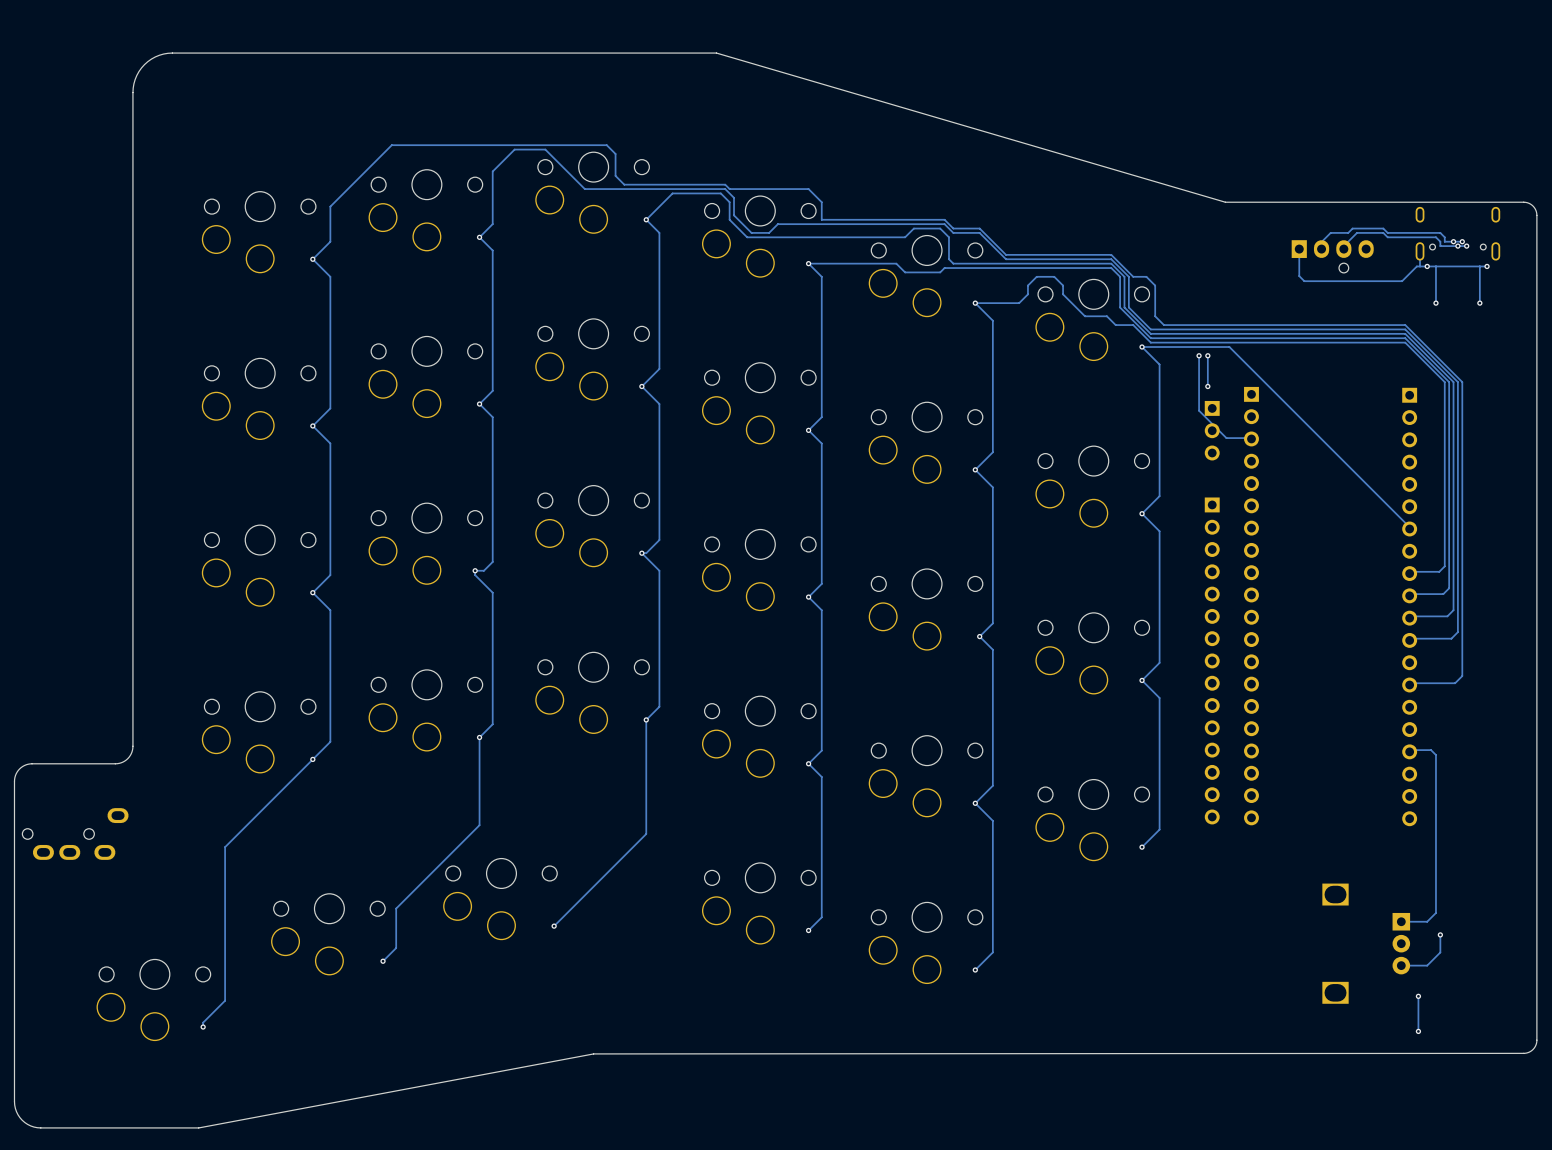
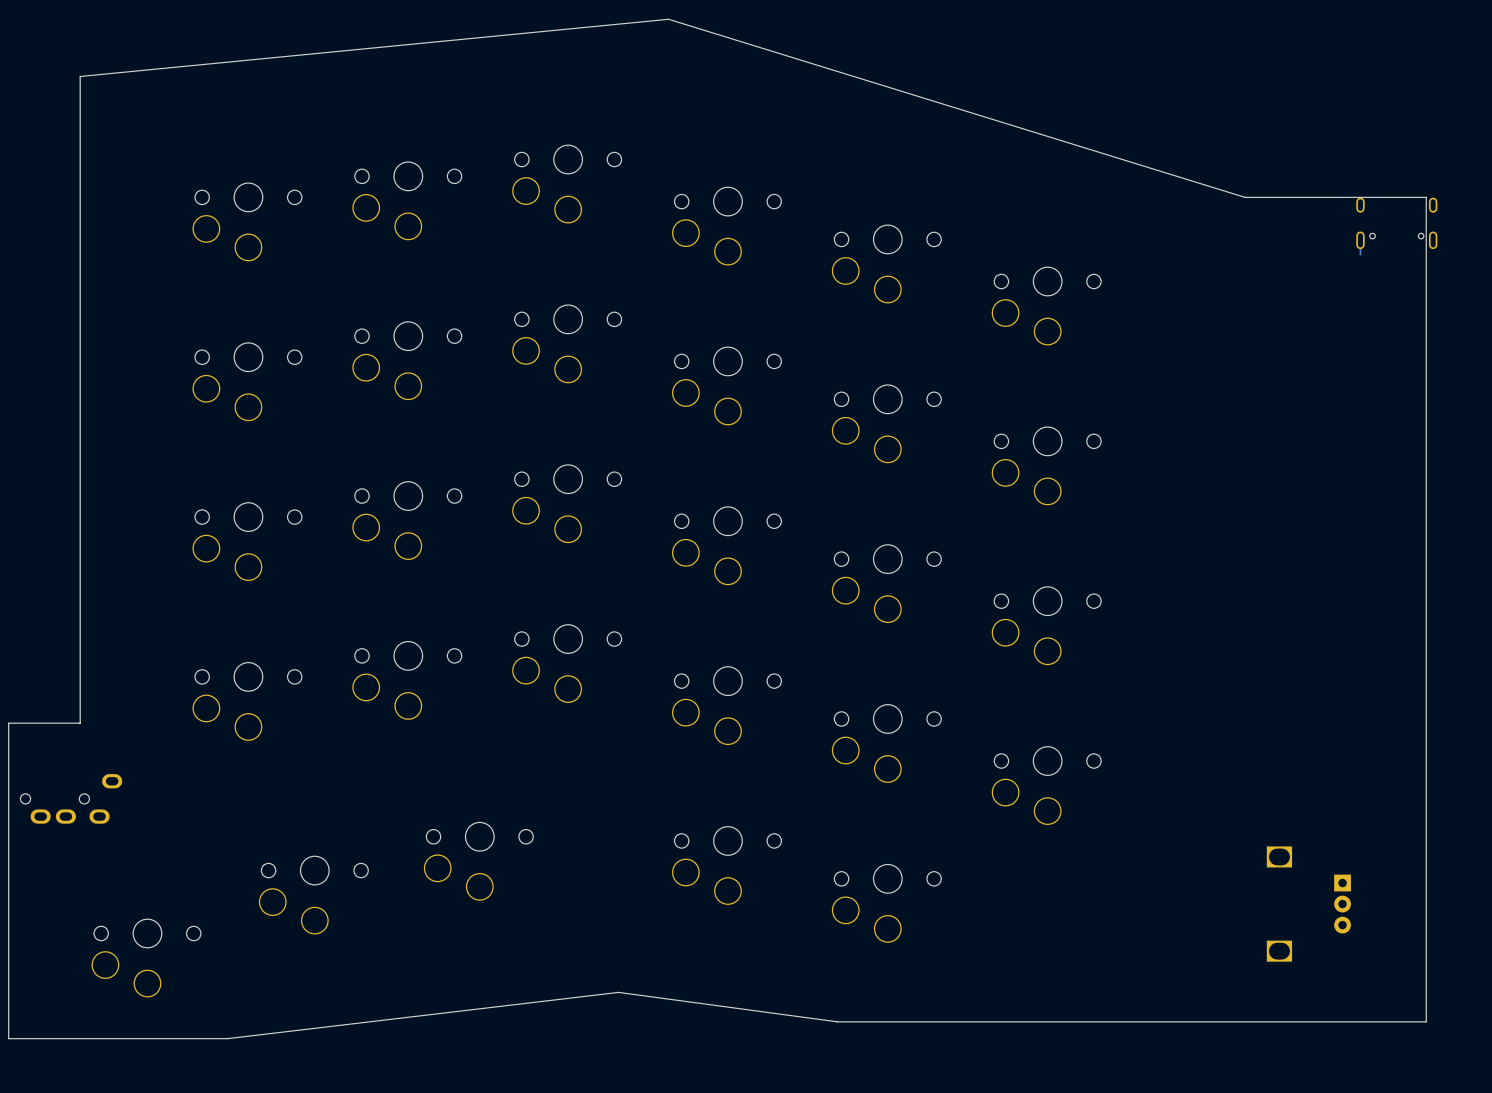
board edge: (716, 53) (1225, 202) (1523, 202) (1534, 207) (1536, 215) (1536, 1040) (1531, 1050) (1523, 1053) (593, 1053) (198, 1127) (40, 1127) (30, 1125) (19, 1117) (14, 1101) (15, 775) (21, 767) (30, 763) (119, 763) (127, 758) (132, 748) (132, 92) (139, 71) (151, 59) (172, 53) (716, 53) -> (668, 19) (1245, 197) (1426, 197) (1426, 1021) (837, 1021) (618, 992) (227, 1038) (8, 1038) (8, 723) (80, 723) (80, 76) (668, 19)
via: (646, 219) -> none
via: (479, 237) -> none
via: (1453, 241) -> none
track: (1462, 241) (1444, 241) (1444, 237) (1440, 232) (1387, 232) (1383, 228) (1352, 228) (1348, 232) (1330, 232) (1321, 242) (1321, 249) -> none
via: (1462, 241) -> none
via: (1457, 246) -> none
track: (1466, 246) (1440, 246) (1440, 241) (1435, 237) (1387, 237) (1383, 232) (1357, 232) (1343, 246) (1343, 249) -> none
via: (1466, 246) -> none
track: (1299, 249) (1299, 276) (1304, 281) (1402, 281) (1416, 266) (1487, 266) -> none
part: (1332, 256) -> none
via: (312, 259) -> none
via: (808, 263) -> none
via: (1427, 266) -> none
track: (1435, 266) (1435, 303) -> none
track: (1479, 266) (1479, 303) -> none
via: (1487, 266) -> none
via: (975, 303) -> none
via: (1435, 303) -> none
via: (1479, 303) -> none
via: (1142, 347) -> none
track: (1199, 355) (1199, 410) (1226, 438) (1253, 438) -> none
via: (1199, 355) -> none
track: (1207, 355) (1207, 386) -> none
via: (1207, 355) -> none
via: (641, 386) -> none
via: (1207, 386) -> none
via: (479, 404) -> none
via: (312, 425) -> none
via: (808, 430) -> none
part: (1212, 430) -> none
via: (975, 469) -> none
via: (1142, 513) -> none
track: (1409, 527) (1229, 347) (1142, 347) (1159, 364) (1159, 496) (1142, 513) (1159, 531) (1159, 662) (1142, 680) (1159, 697) (1159, 829) (1142, 847) -> none
via: (641, 553) -> none
via: (475, 570) -> none
track: (1409, 571) (1439, 571) (1444, 566) (1444, 382) (1405, 342) (1150, 342) (1133, 325) (1115, 325) (1106, 316) (1084, 316) (1063, 294) (1063, 285) (1054, 276) (1036, 276) (1027, 285) (1027, 294) (1019, 303) (975, 303) (992, 320) (992, 452) (975, 469) (992, 487) (992, 623) (979, 636) (992, 649) (992, 785) (975, 803) (992, 820) (992, 952) (975, 970) -> none
via: (312, 592) -> none
track: (1409, 594) (1443, 594) (1449, 588) (1449, 382) (1405, 338) (1150, 338) (1120, 307) (1120, 276) (1111, 268) (944, 268) (940, 272) (905, 272) (896, 263) (808, 263) (821, 276) (821, 417) (808, 430) (821, 443) (821, 583) (808, 597) (821, 610) (821, 750) (808, 763) (821, 776) (821, 917) (808, 930) -> none
via: (808, 597) -> none
part: (1251, 606) -> none
part: (1409, 606) -> none
track: (1409, 616) (1447, 616) (1453, 610) (1453, 382) (1405, 333) (1150, 333) (1124, 307) (1124, 276) (1111, 263) (953, 263) (948, 259) (948, 237) (940, 228) (913, 228) (905, 237) (747, 237) (729, 219) (729, 202) (720, 193) (672, 193) (646, 219) (659, 232) (659, 368) (641, 386) (659, 404) (659, 540) (646, 553) (641, 553) (659, 570) (659, 706) (646, 719) (646, 833) (554, 926) -> none
via: (979, 636) -> none
track: (1409, 638) (1451, 638) (1457, 632) (1457, 382) (1405, 329) (1150, 329) (1128, 307) (1128, 276) (1111, 259) (1006, 259) (979, 232) (953, 232) (944, 224) (777, 224) (769, 232) (751, 232) (734, 215) (734, 197) (725, 189) (584, 189) (545, 149) (514, 149) (492, 171) (492, 224) (479, 237) (492, 250) (492, 390) (479, 404) (492, 417) (492, 561) (483, 570) (475, 570) (475, 575) (492, 592) (492, 724) (479, 737) (479, 825) (396, 908) (396, 948) (383, 961) -> none
part: (1212, 660) -> none
via: (1142, 680) -> none
track: (1409, 683) (1455, 683) (1462, 676) (1462, 382) (1405, 325) (1163, 325) (1155, 316) (1155, 285) (1146, 276) (1133, 276) (1111, 254) (1006, 254) (979, 228) (953, 228) (944, 219) (821, 219) (821, 202) (808, 189) (729, 189) (725, 184) (624, 184) (615, 175) (615, 153) (606, 145) (391, 145) (330, 206) (330, 241) (312, 259) (330, 276) (330, 408) (312, 425) (330, 443) (330, 575) (312, 592) (330, 610) (330, 741) (225, 847) (225, 1000) (203, 1022) (203, 1027) -> none
via: (646, 719) -> none
via: (479, 737) -> none
track: (1409, 750) (1431, 750) (1435, 755) (1435, 912) (1427, 921) (1401, 921) -> none
via: (312, 759) -> none
via: (808, 763) -> none
via: (975, 803) -> none
via: (1142, 847) -> none
via: (554, 926) -> none
via: (808, 930) -> none
track: (1440, 934) (1440, 952) (1427, 965) (1401, 965) -> none
via: (1440, 934) -> none
via: (383, 961) -> none
via: (975, 970) -> none
track: (1418, 996) (1418, 1031) -> none
via: (1418, 996) -> none
via: (203, 1027) -> none
via: (1418, 1031) -> none

